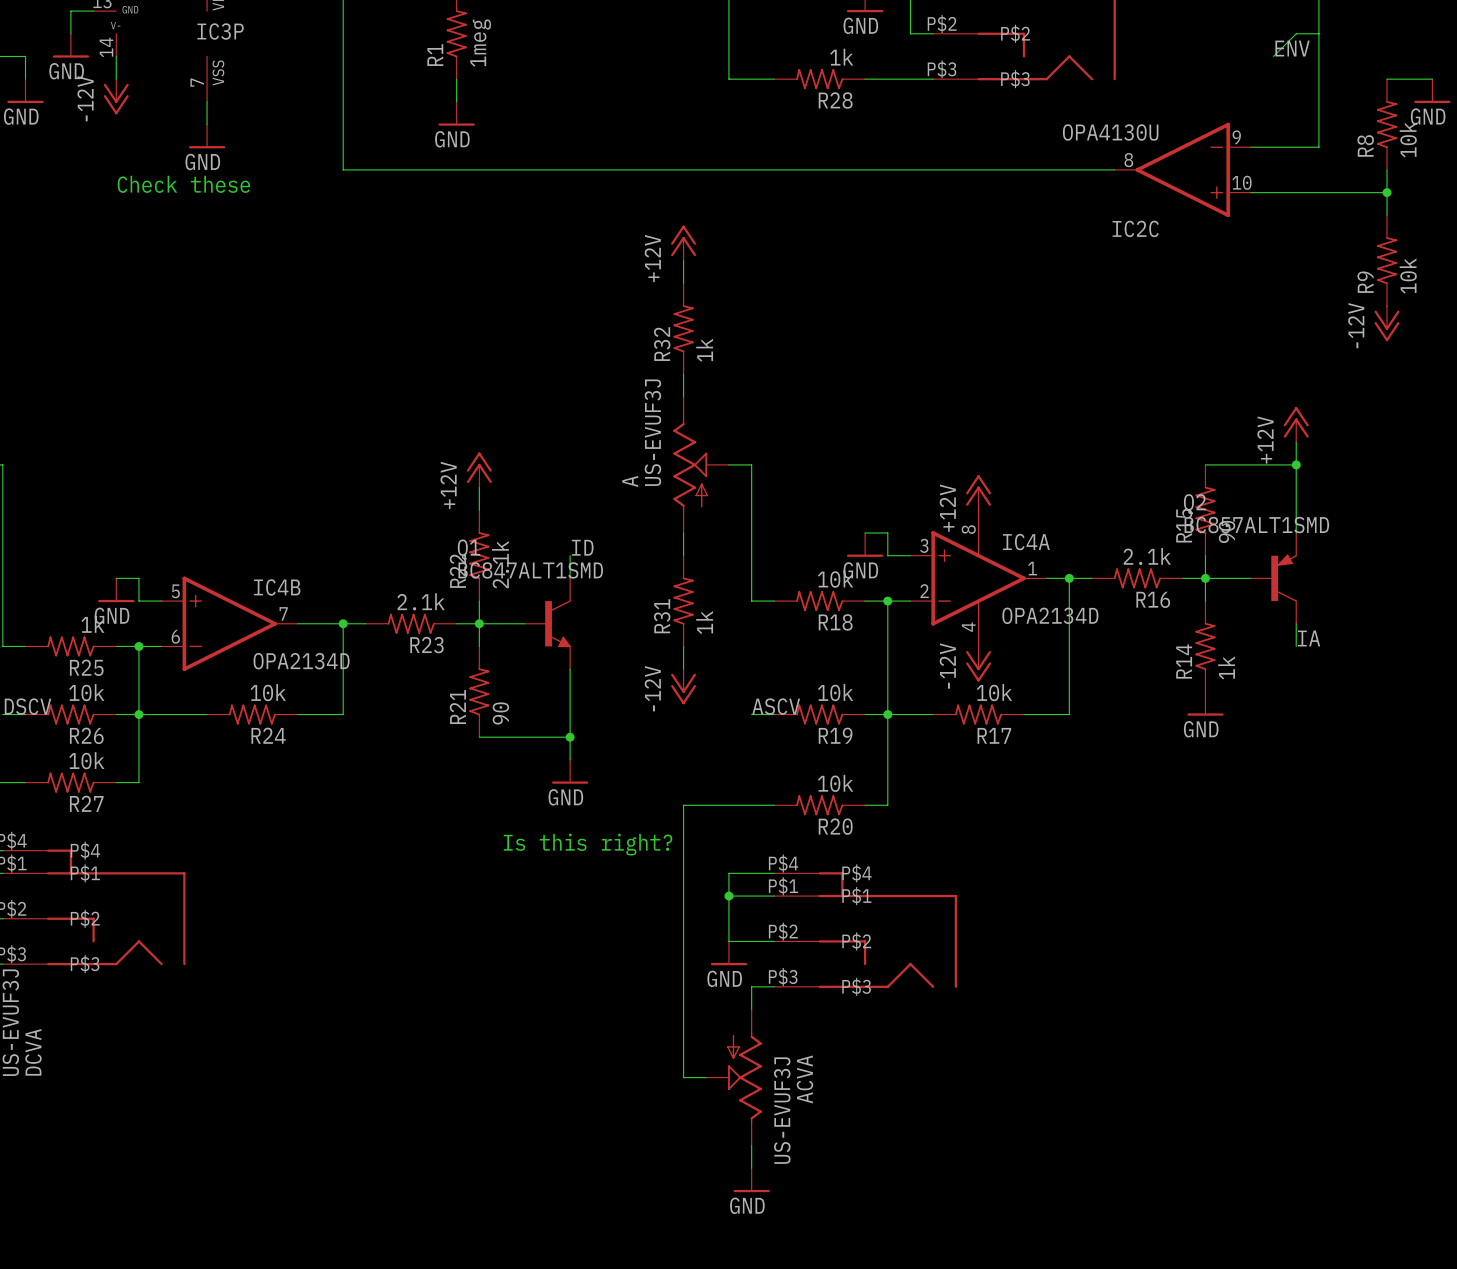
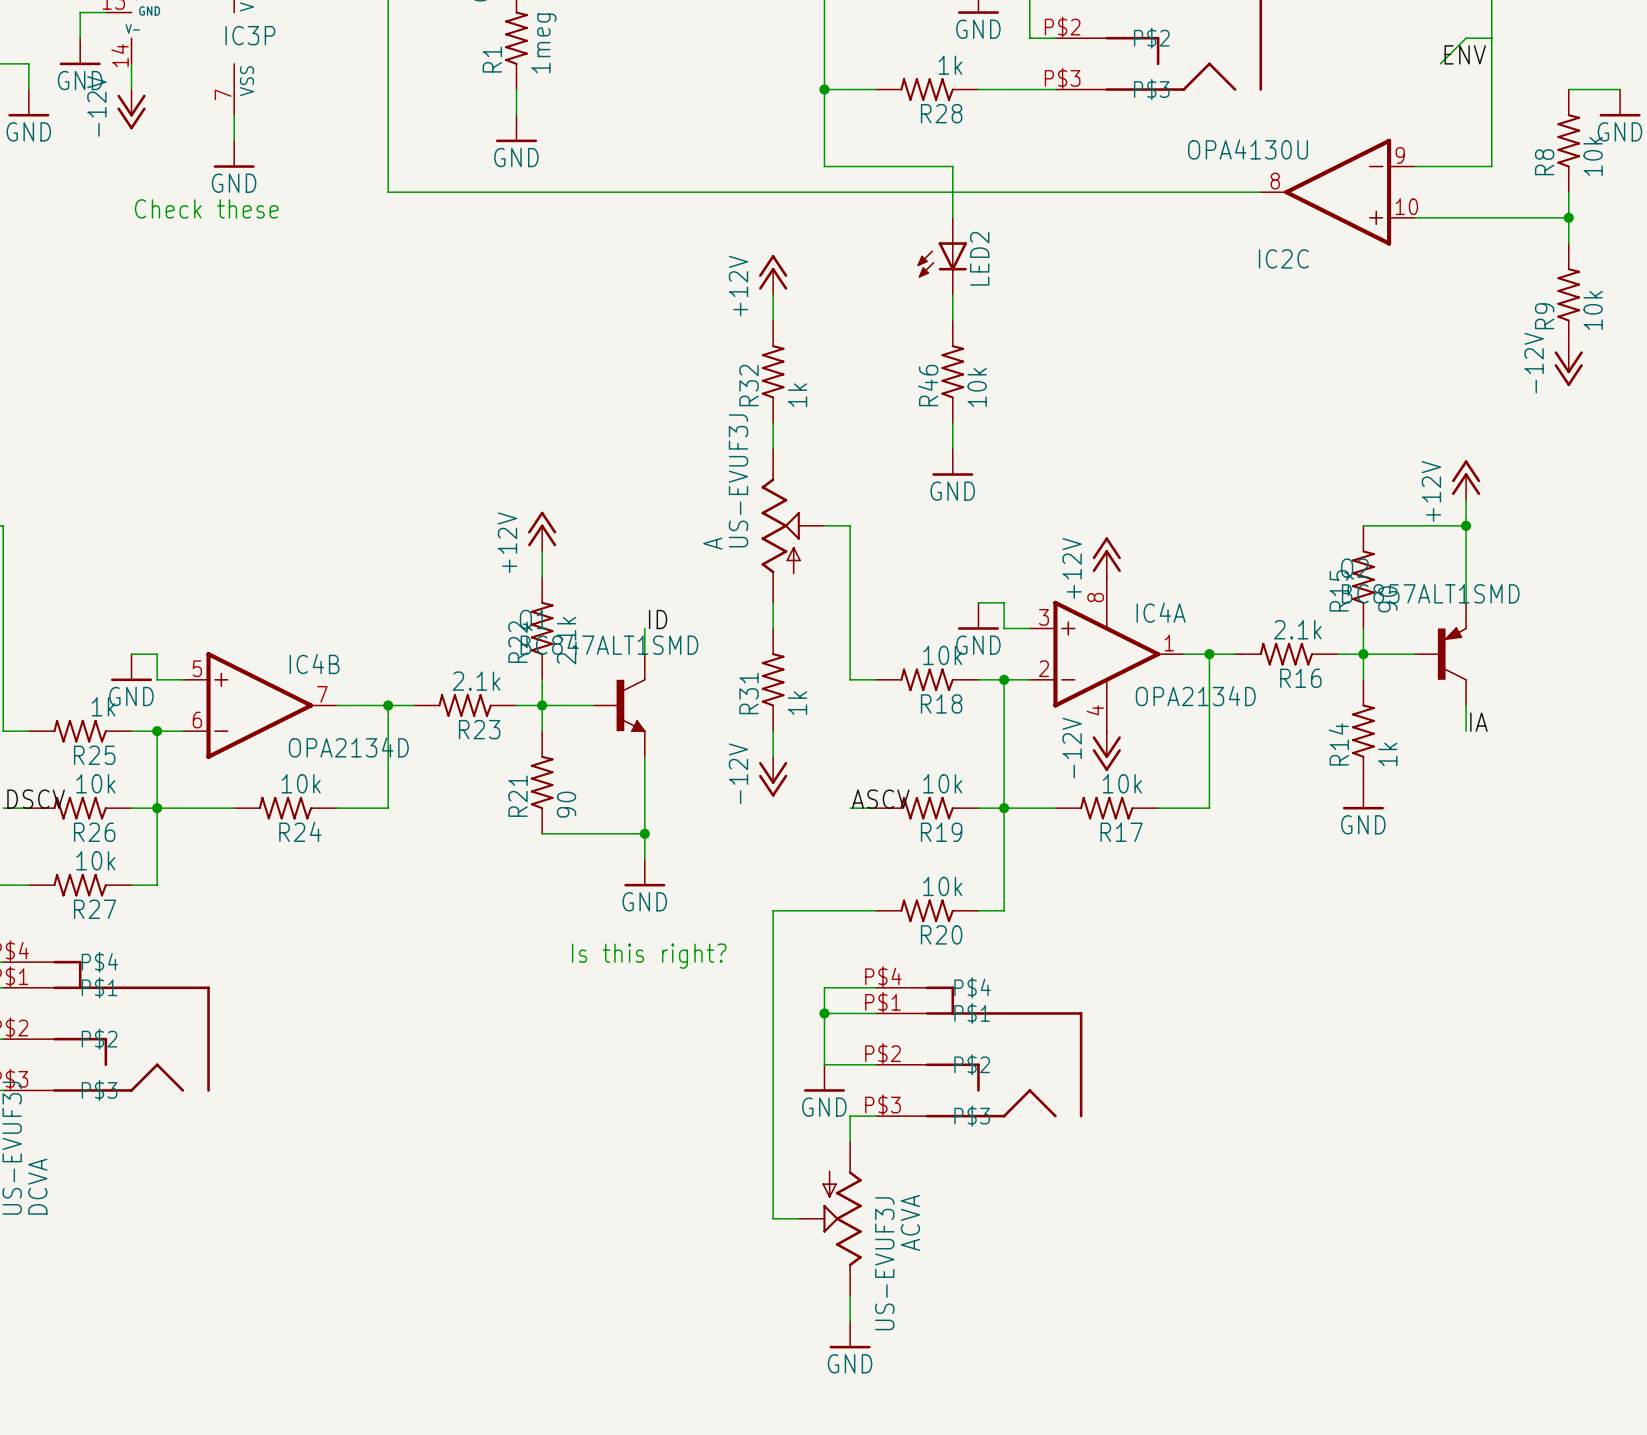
wire: none -> (824, 89) (824, 166) (952, 166) (952, 217)
junction: none -> (824, 89)
LED2: none -> (942, 256)
wire: none -> (952, 294) (952, 320)
R46: none -> 10k (952, 371)
wire: none -> (952, 423) (952, 448)
power symbol: none -> GND (952, 462)

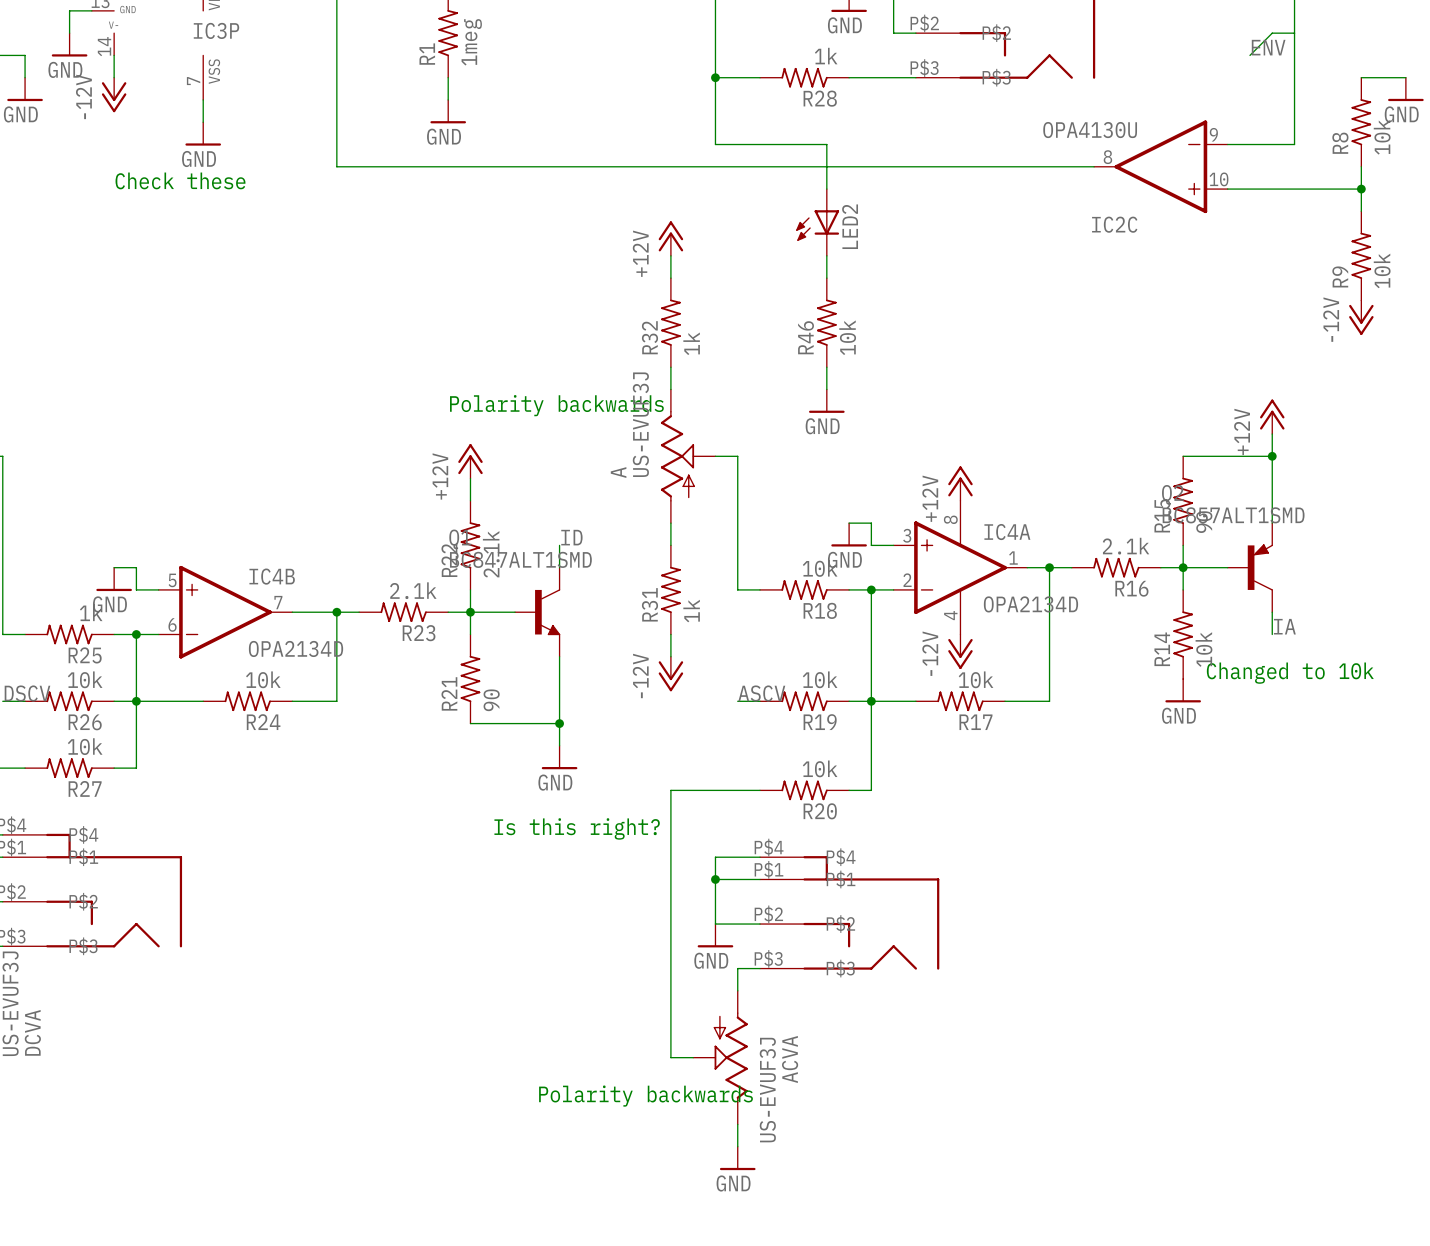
text: none -> Polarity backwards (556, 405)
R14 value: 1k (1387, 754) -> 10k (1203, 649)
text: none -> Changed to 10k (1290, 673)
text: none -> Polarity backwards (645, 1096)

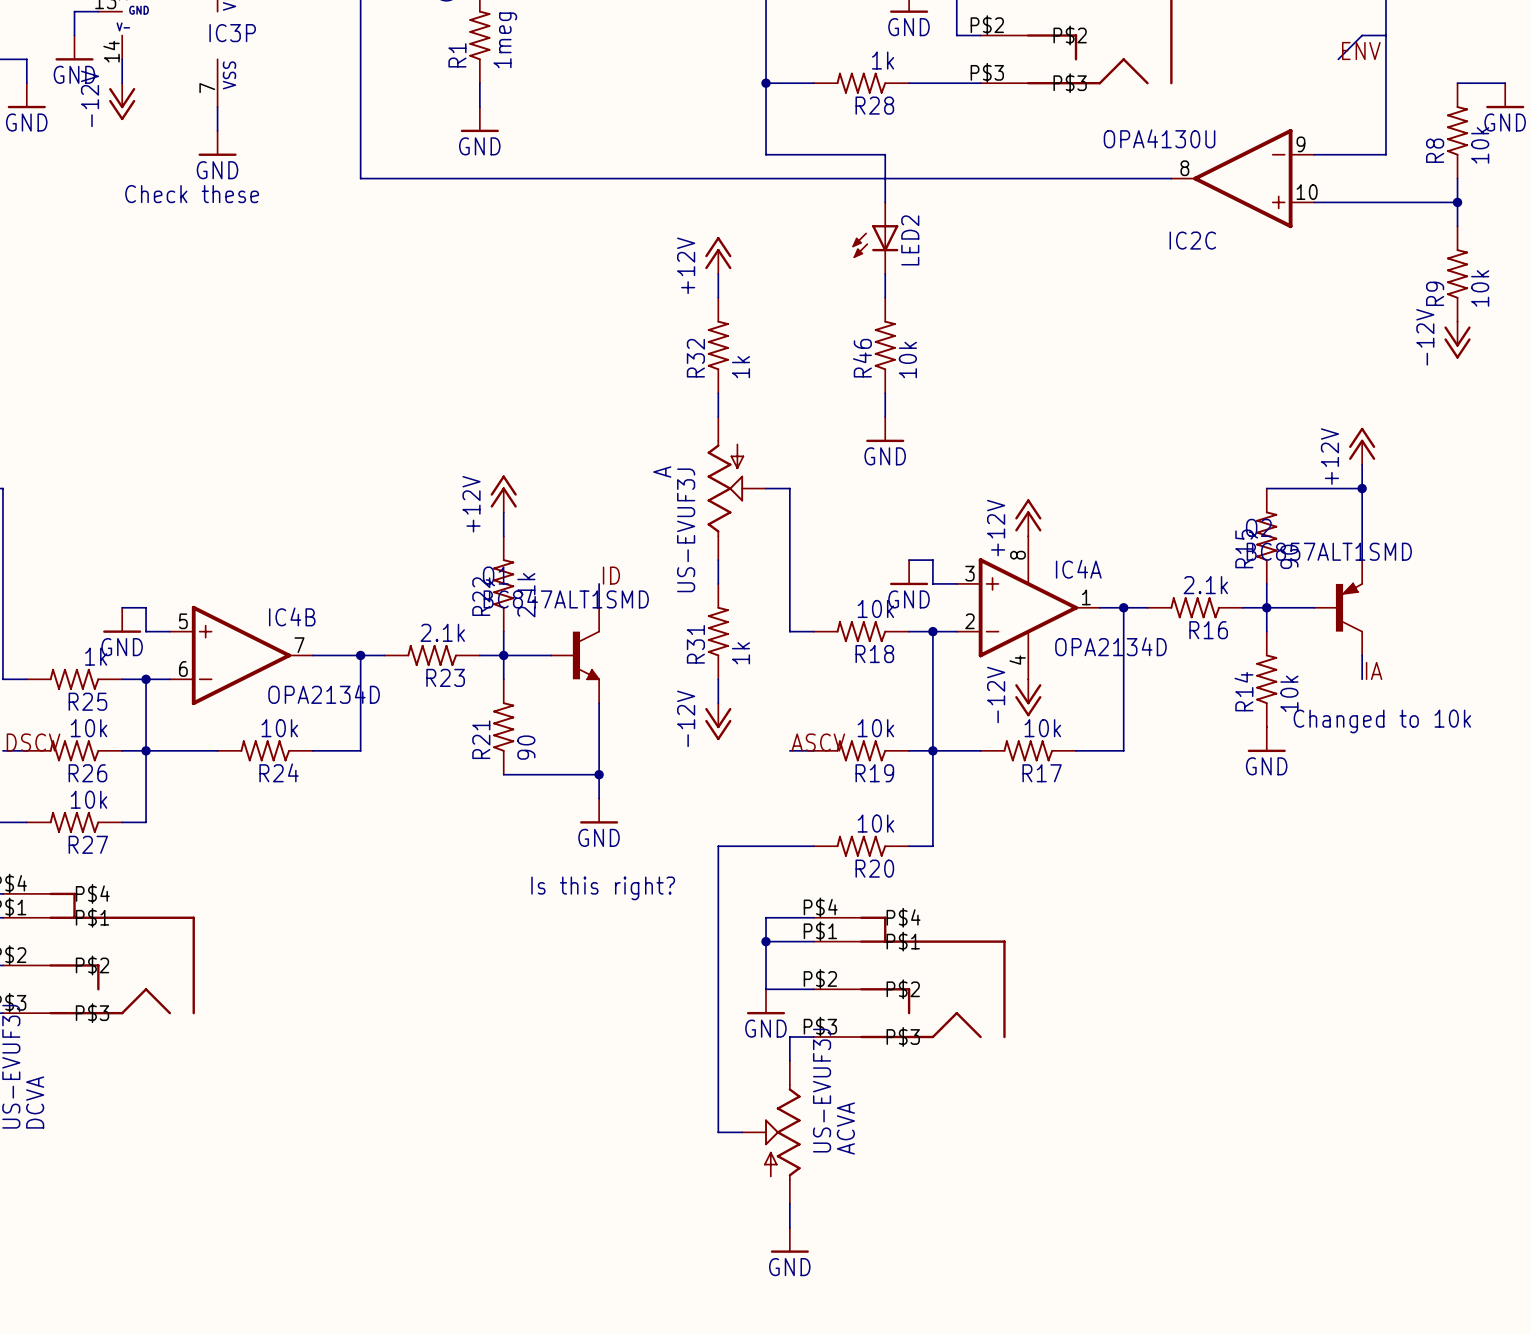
text: Polarity backwards (556, 405) -> none
A flip: as is (677, 456) -> up-down (725, 488)
ACVA flip: as is (730, 1057) -> up-down (782, 1132)
text: Polarity backwards (645, 1096) -> none

